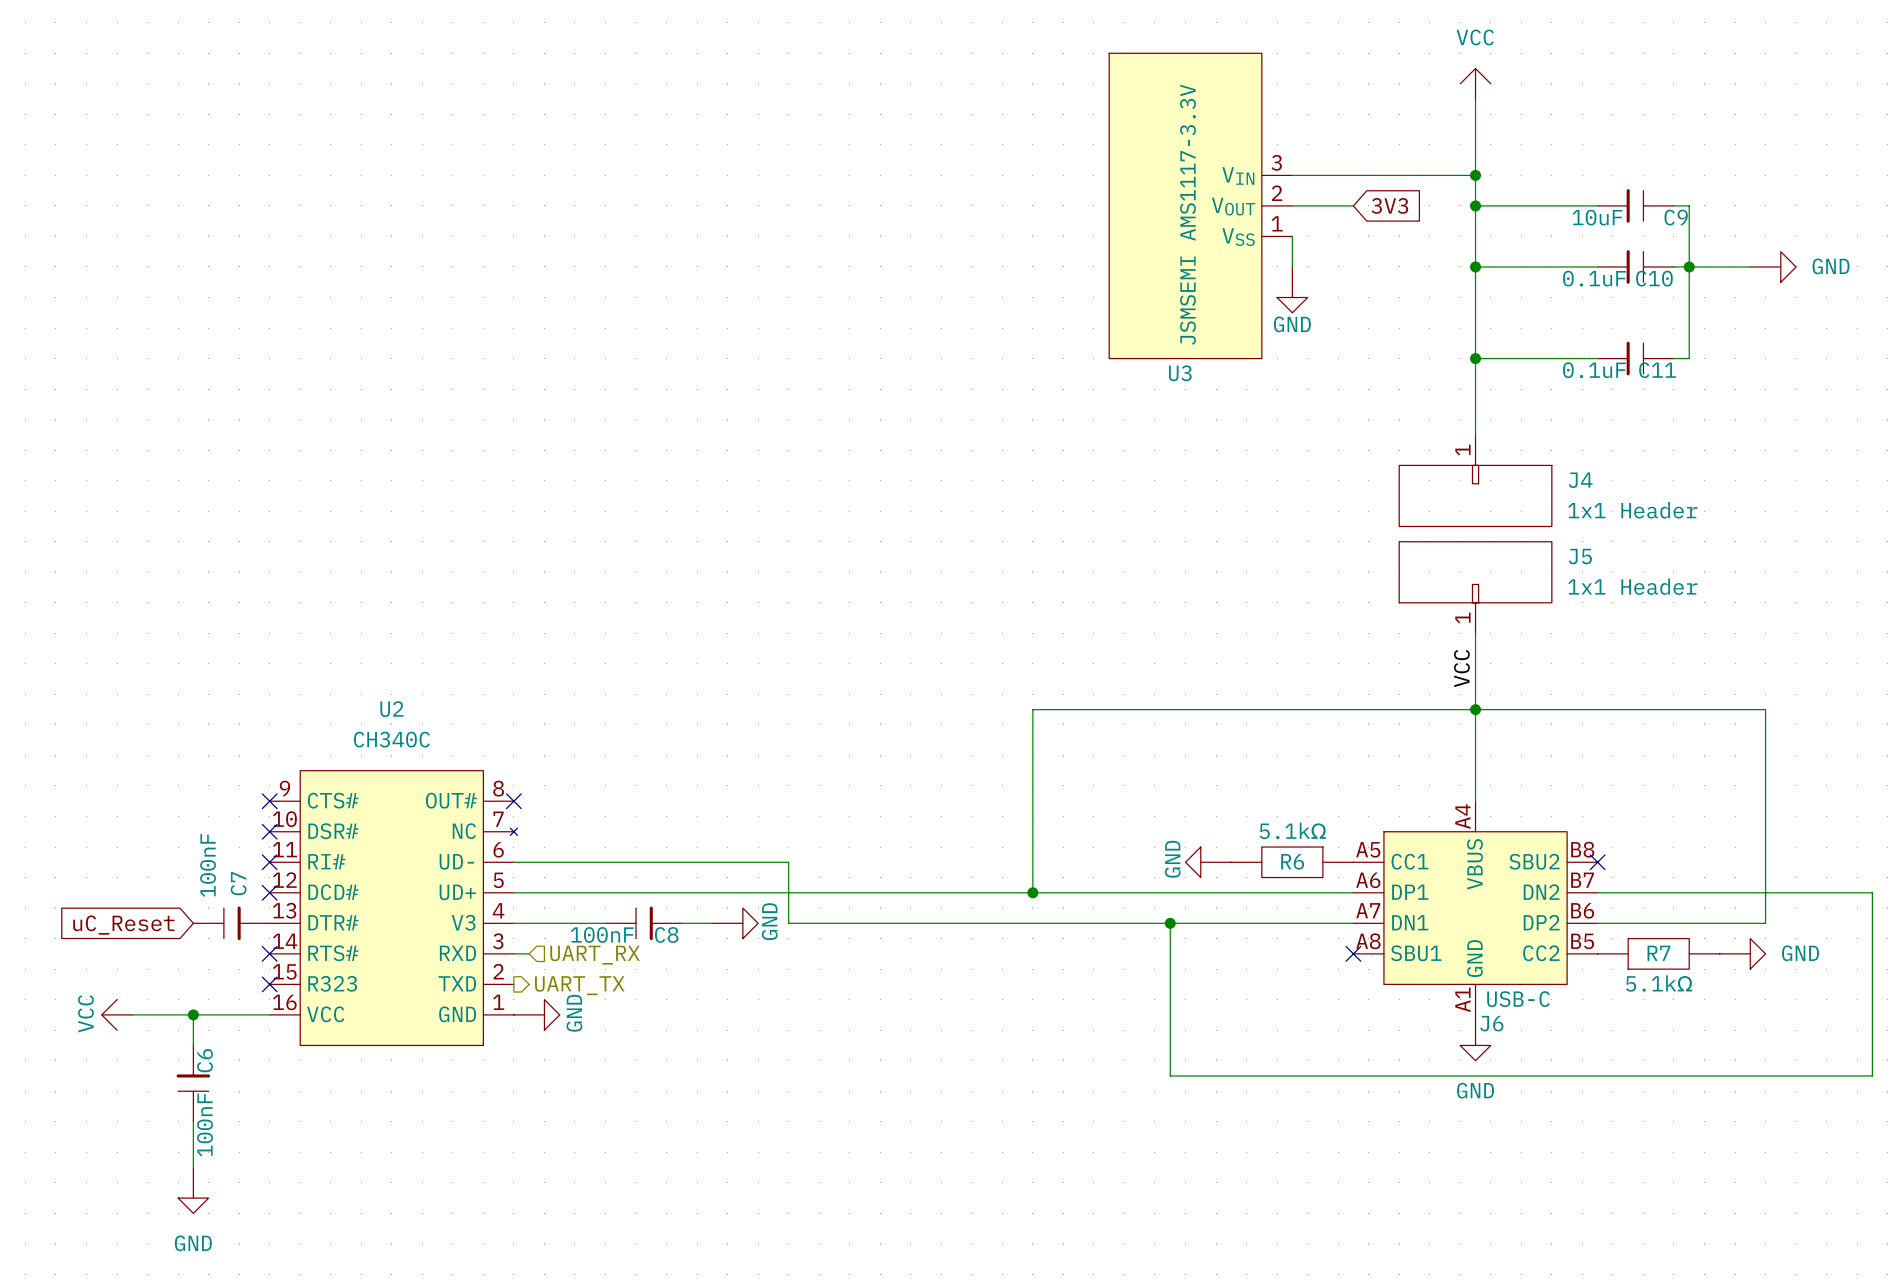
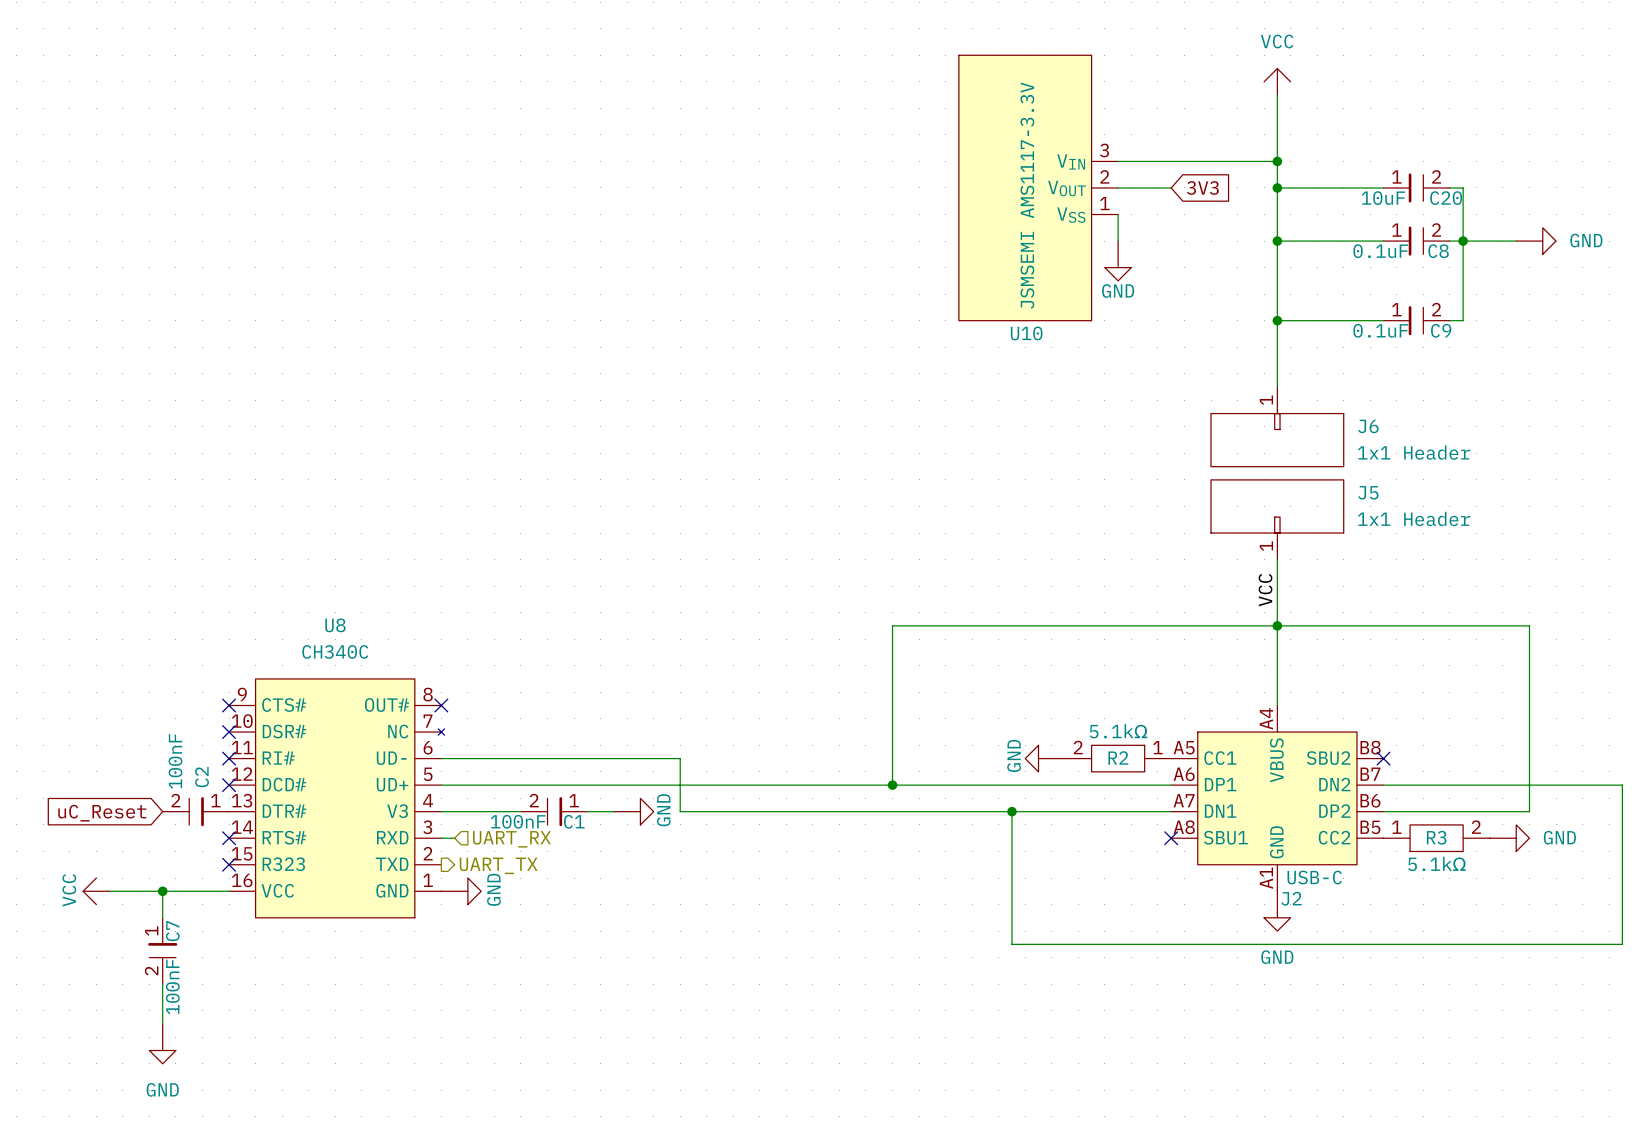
C9 position: (1635, 205) -> (1416, 320)
C20: none -> 10uF (1416, 187)
C9 name position: C9 (1676, 217) -> C9 (1441, 330)
C10: 0.1uF (1635, 266) -> none
C9 pin number: none -> 1 (1396, 309)
C9 pin number: none -> 2 (1436, 309)
C11: 0.1uF (1635, 358) -> none
U3 name: U3 (1180, 373) -> U10 (1026, 333)
J4 name: J4 (1580, 480) -> J6 (1368, 426)
U2 name: U2 (391, 709) -> U8 (335, 625)
R6 pin number: none -> 2 (1078, 747)
R6 pin number: none -> 1 (1157, 747)
R6 name: R6 (1292, 861) -> R2 (1118, 757)
C7 symbol: [193, 906, 270, 941] -> [148, 917, 178, 985]
C8 symbol: [605, 906, 682, 941] -> [1383, 226, 1450, 256]
C2: none -> 100nF (195, 811)
C1: none -> 100nF (554, 811)
R7 pin number: none -> 1 (1396, 827)
R7 pin number: none -> 2 (1476, 827)
R7 name: R7 (1658, 953) -> R3 (1436, 837)
J6 name: J6 (1491, 1023) -> J2 (1291, 898)
C6: 100nF (193, 1083) -> none

